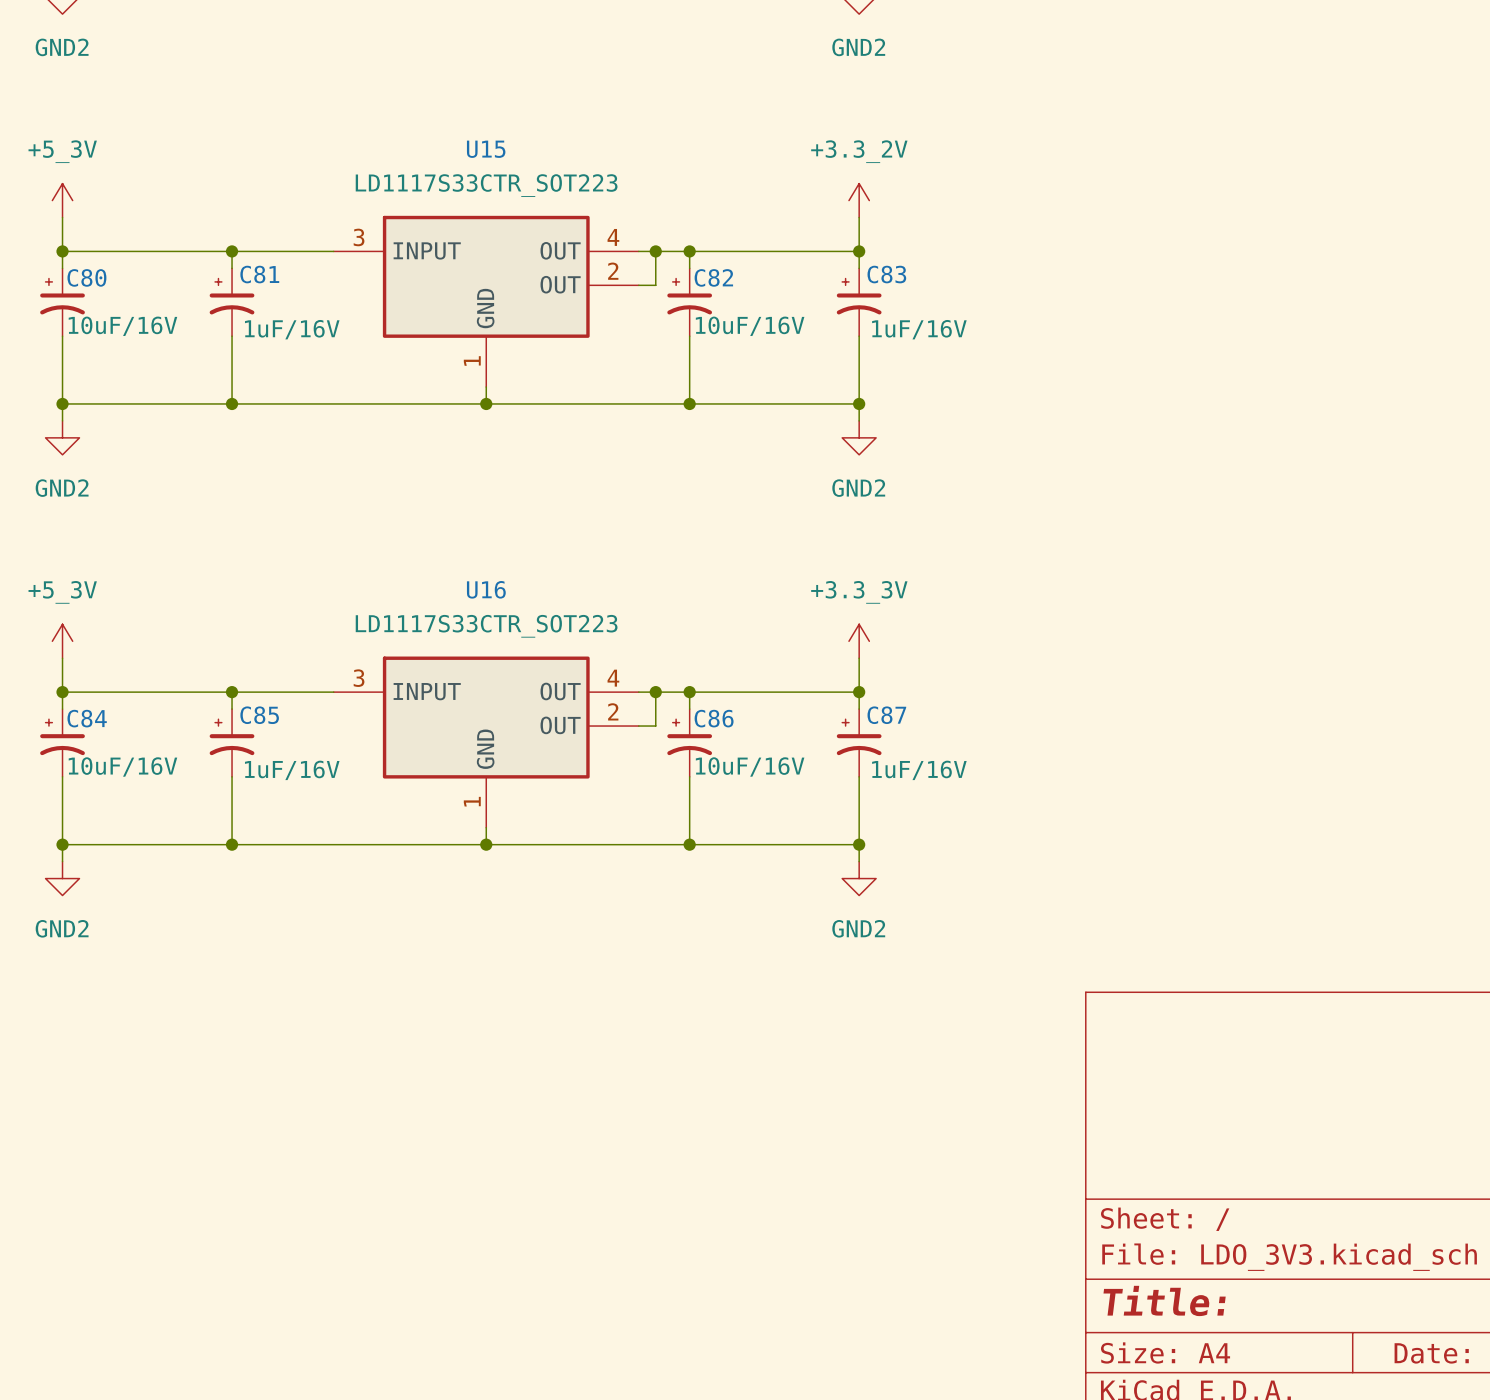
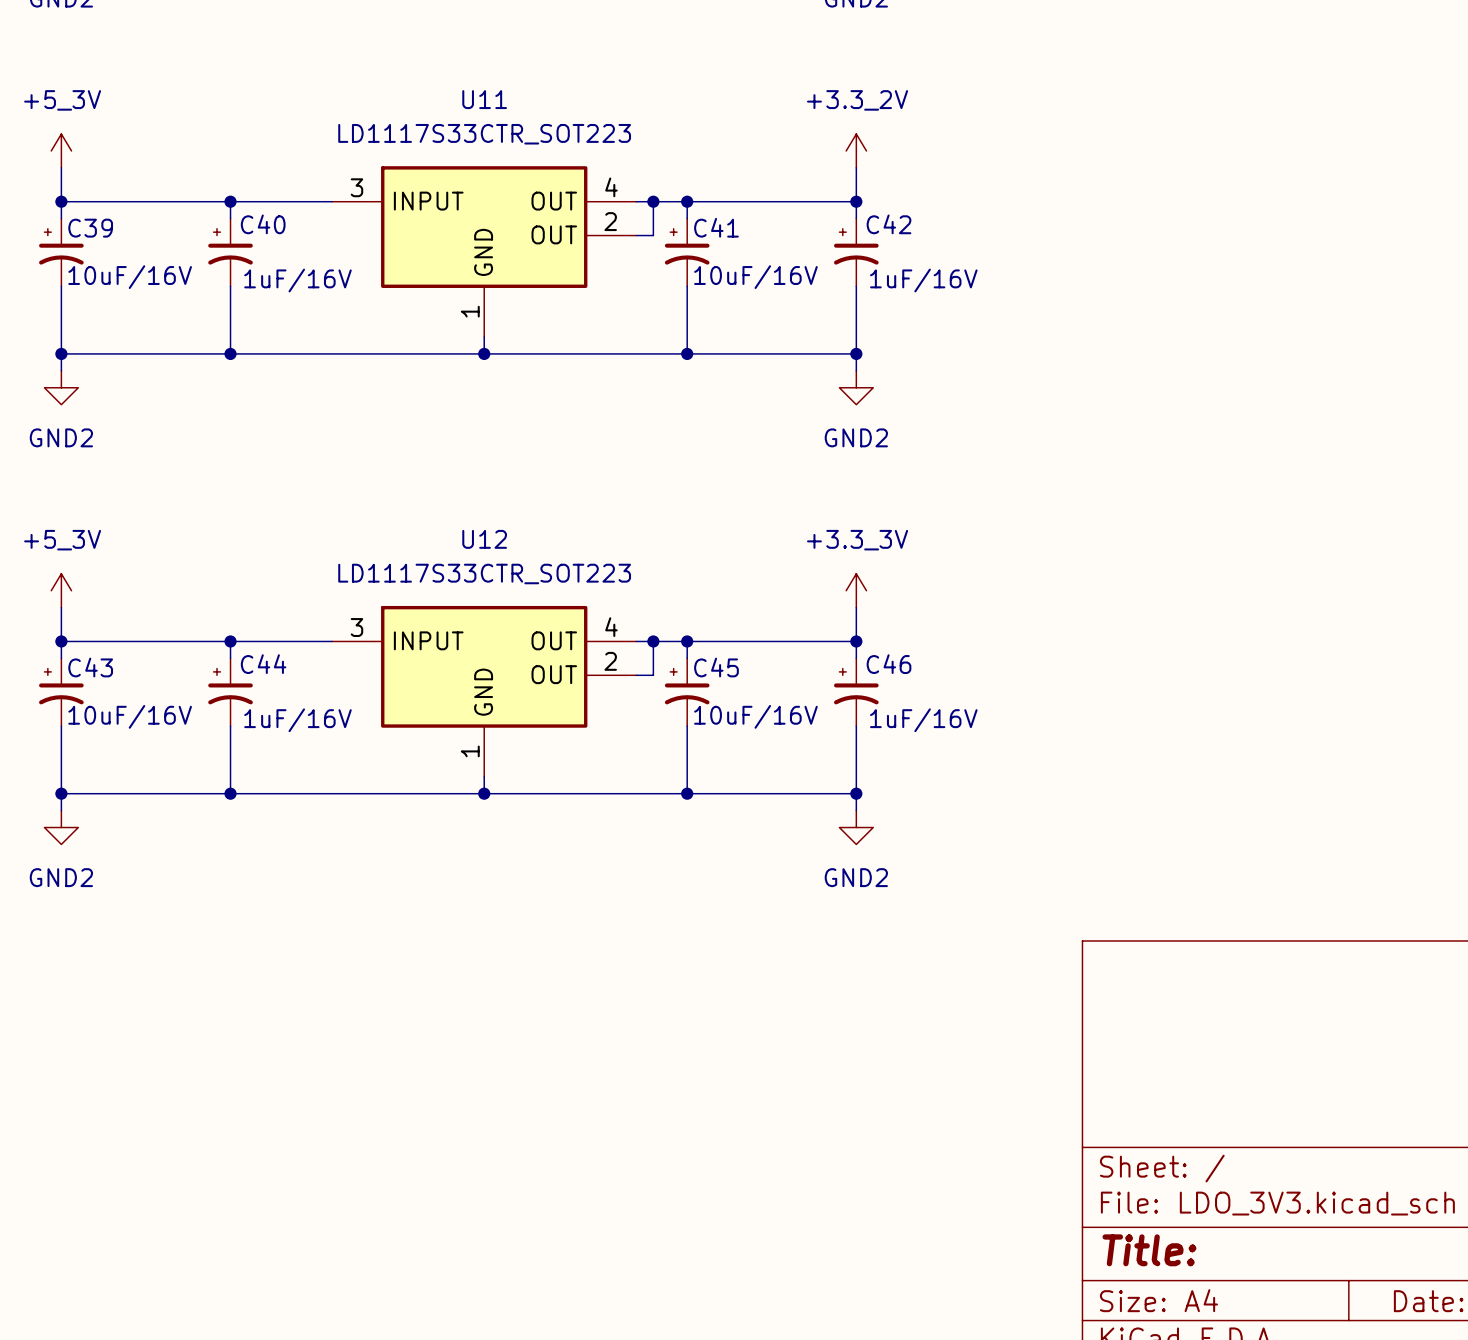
U15 name: U15 (486, 149) -> U11 (484, 99)
C81 name: C81 (259, 274) -> C40 (263, 224)
C83 name: C83 (886, 274) -> C42 (889, 224)
C80 name: C80 (86, 277) -> C39 (90, 228)
C82 name: C82 (713, 277) -> C41 (716, 227)
U16 name: U16 (486, 589) -> U12 (484, 539)
C85 name: C85 (259, 715) -> C44 (263, 664)
C87 name: C87 (886, 715) -> C46 (889, 664)
C84 name: C84 (87, 718) -> C43 (90, 667)
C86 name: C86 (714, 718) -> C45 (716, 667)

